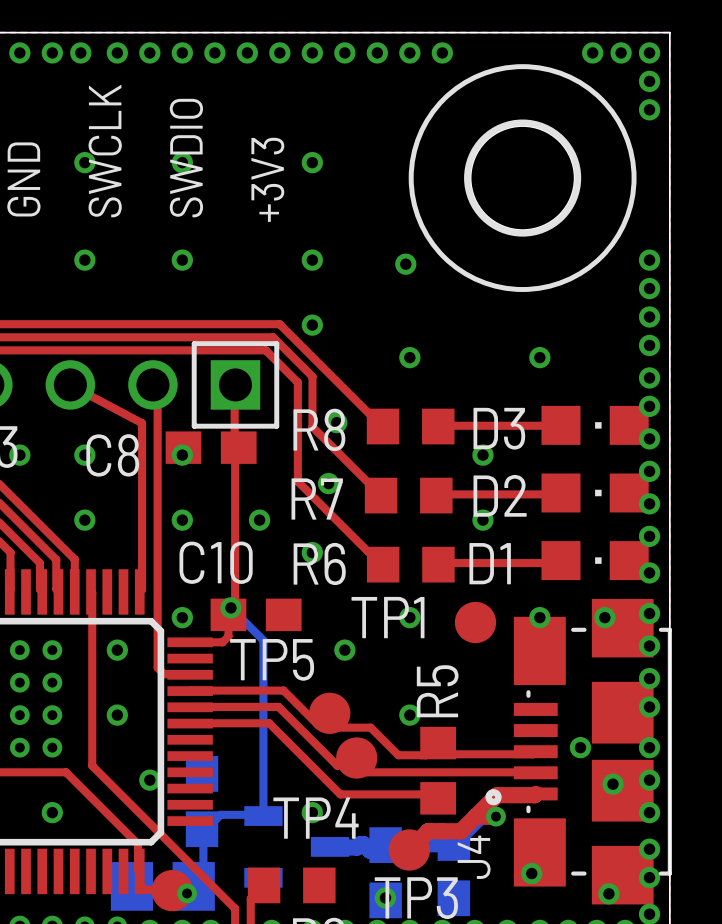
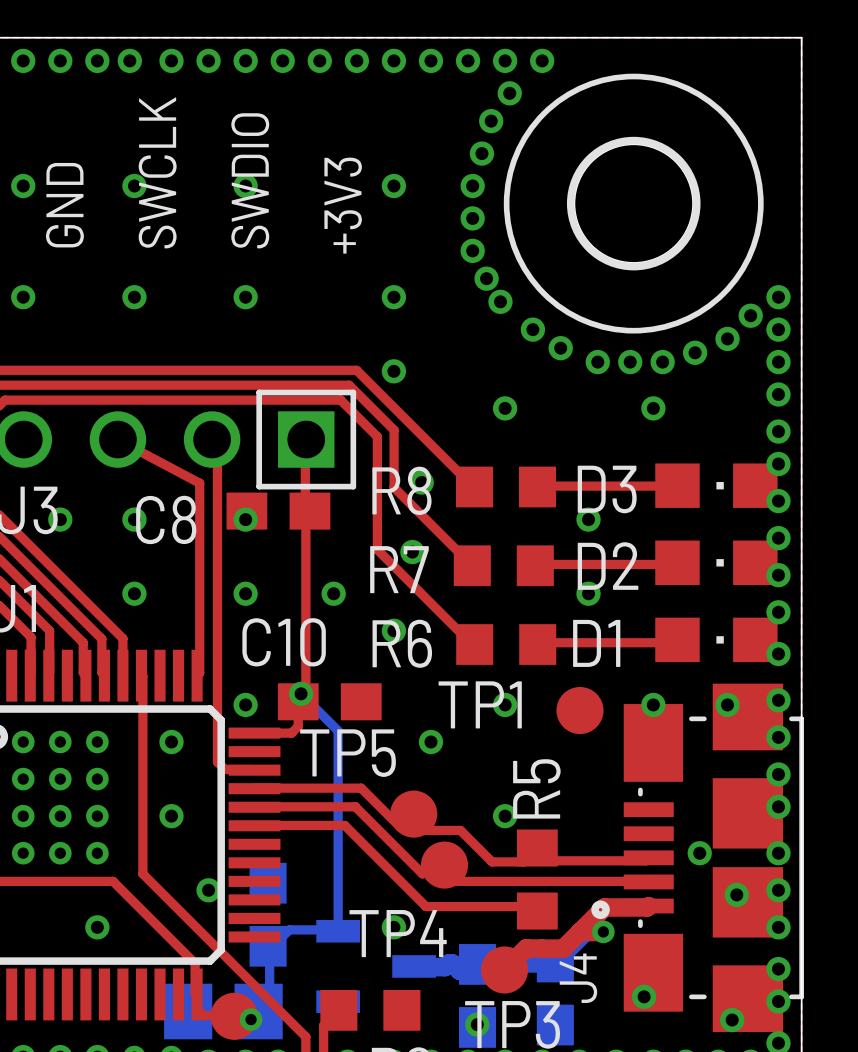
via: (592, 52) -> none
via: (621, 52) -> none
via: (649, 52) -> none
via: none -> (509, 93)
via: (649, 81) -> none
via: none -> (491, 121)
via: (649, 109) -> none
via: none -> (481, 153)
via: none -> (472, 186)
via: none -> (472, 218)
via: none -> (472, 250)
via: none -> (486, 278)
via: none -> (750, 315)
via: none -> (532, 329)
via: none -> (727, 338)
via: none -> (560, 348)
via: none -> (695, 352)
via: none -> (597, 362)
via: none -> (630, 362)
via: none -> (662, 362)

